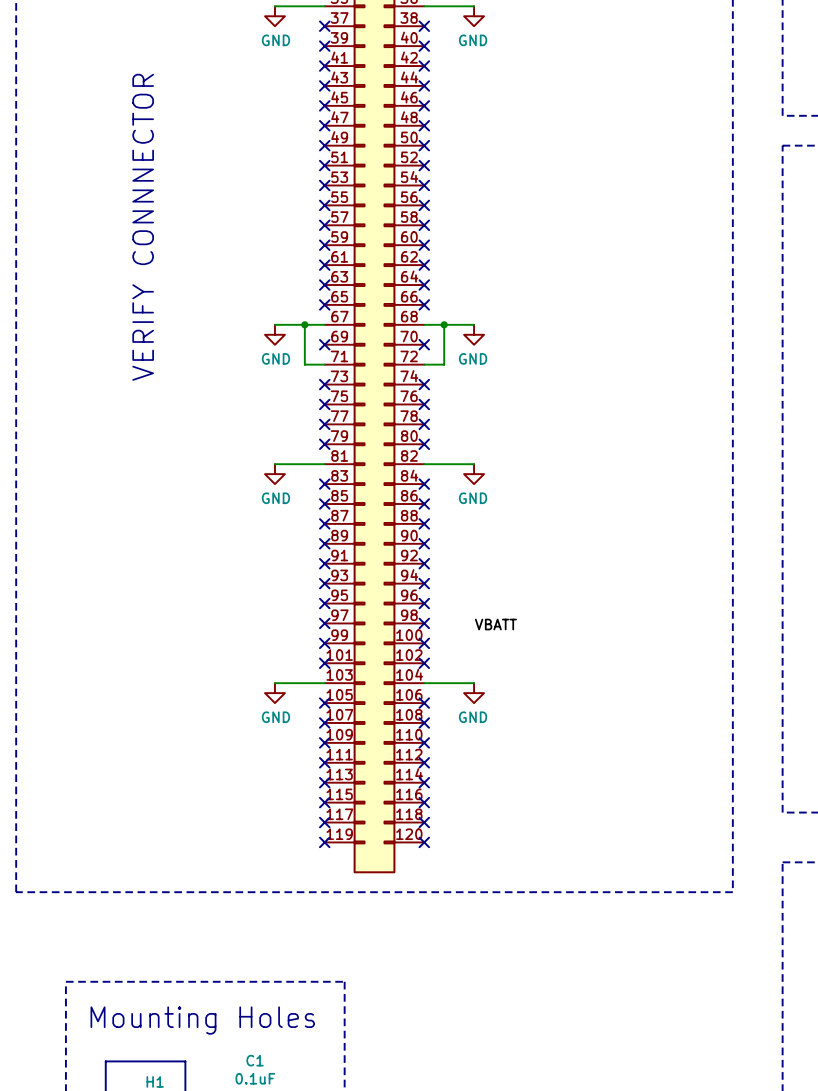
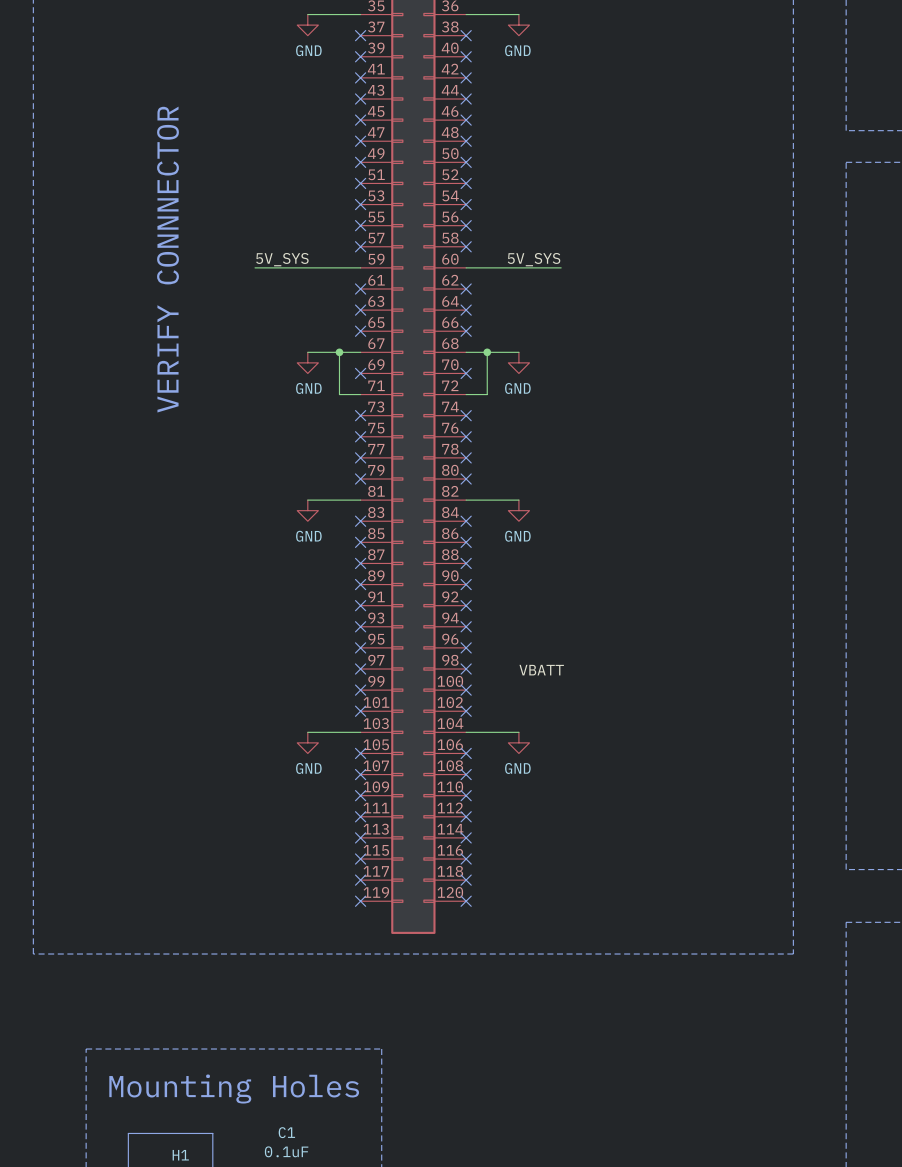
label: none -> 5V_SYS (282, 259)
label: none -> 5V_SYS (534, 259)
wire: none -> (255, 267) (360, 267)
no-connect mark: (324, 245) -> none
wire: none -> (466, 267) (561, 267)
no-connect mark: (424, 245) -> none

